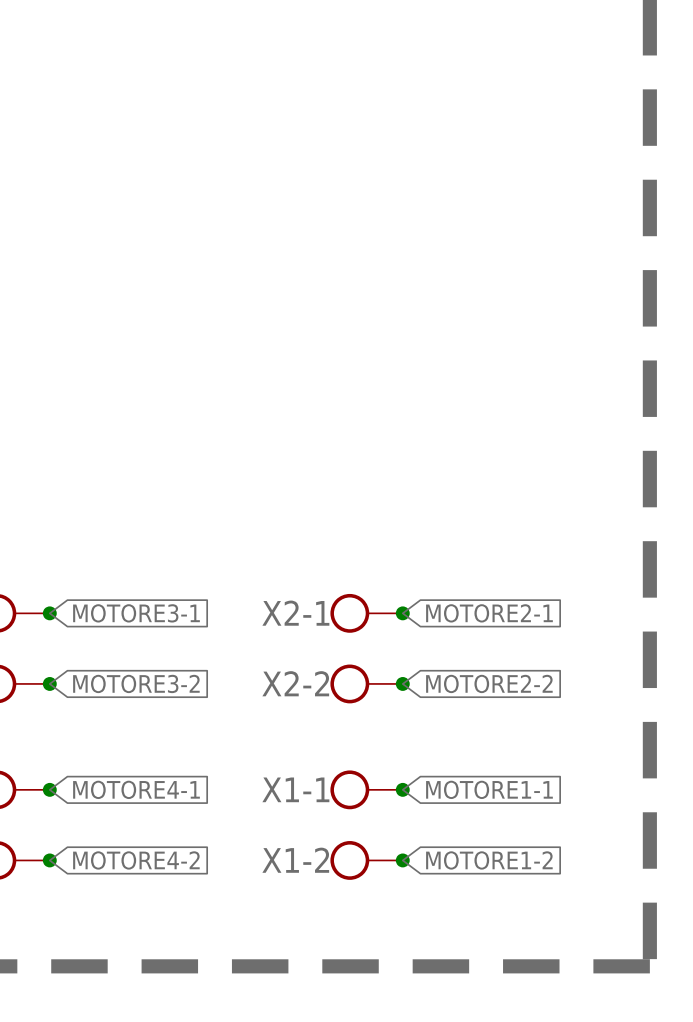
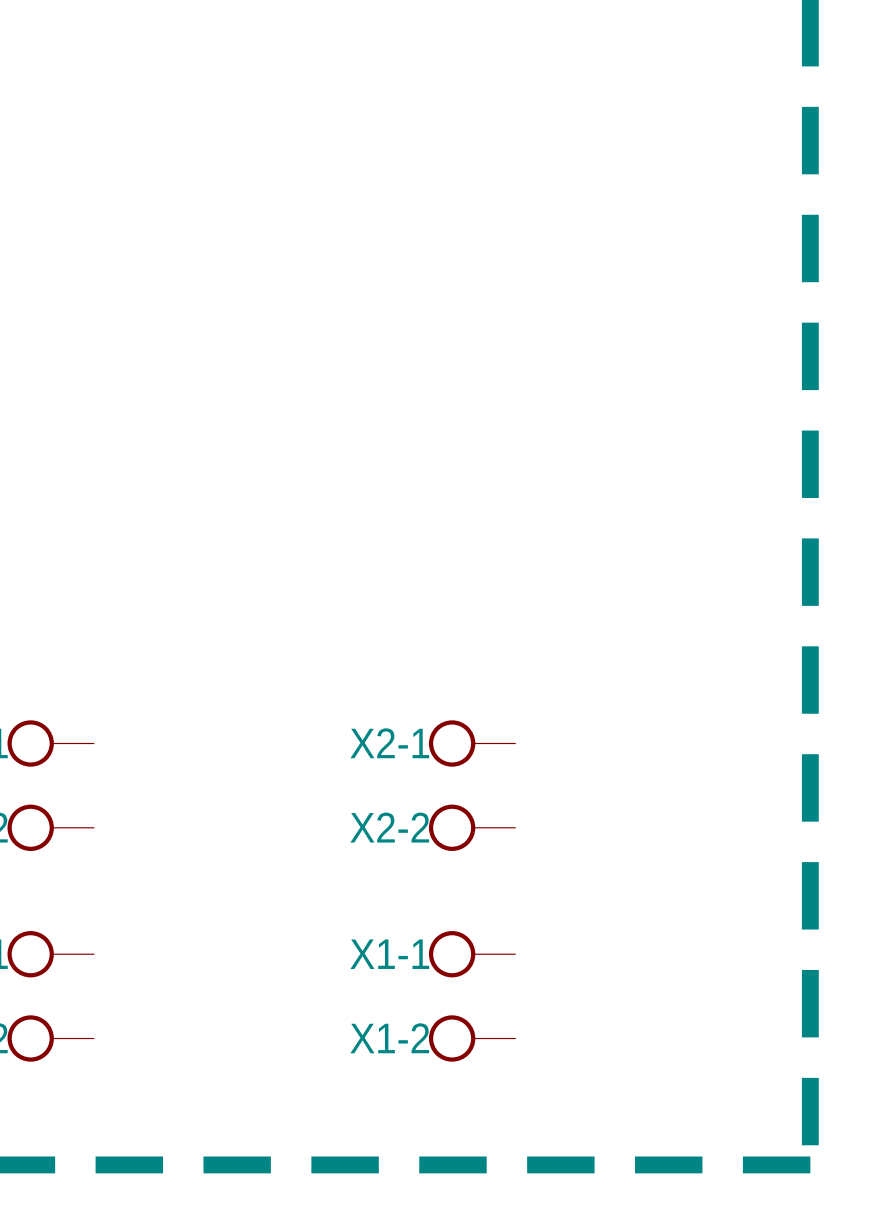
junction: (49, 613) -> none
global label: MOTORE3-1 (136, 613) -> none
junction: (402, 613) -> none
global label: MOTORE2-1 (489, 613) -> none
junction: (49, 683) -> none
global label: MOTORE3-2 (136, 683) -> none
junction: (402, 683) -> none
global label: MOTORE2-2 (489, 683) -> none
junction: (49, 789) -> none
global label: MOTORE4-1 (136, 789) -> none
junction: (402, 789) -> none
global label: MOTORE1-1 (489, 789) -> none
junction: (49, 860) -> none
global label: MOTORE4-2 (136, 860) -> none
junction: (402, 860) -> none
global label: MOTORE1-2 (489, 860) -> none

